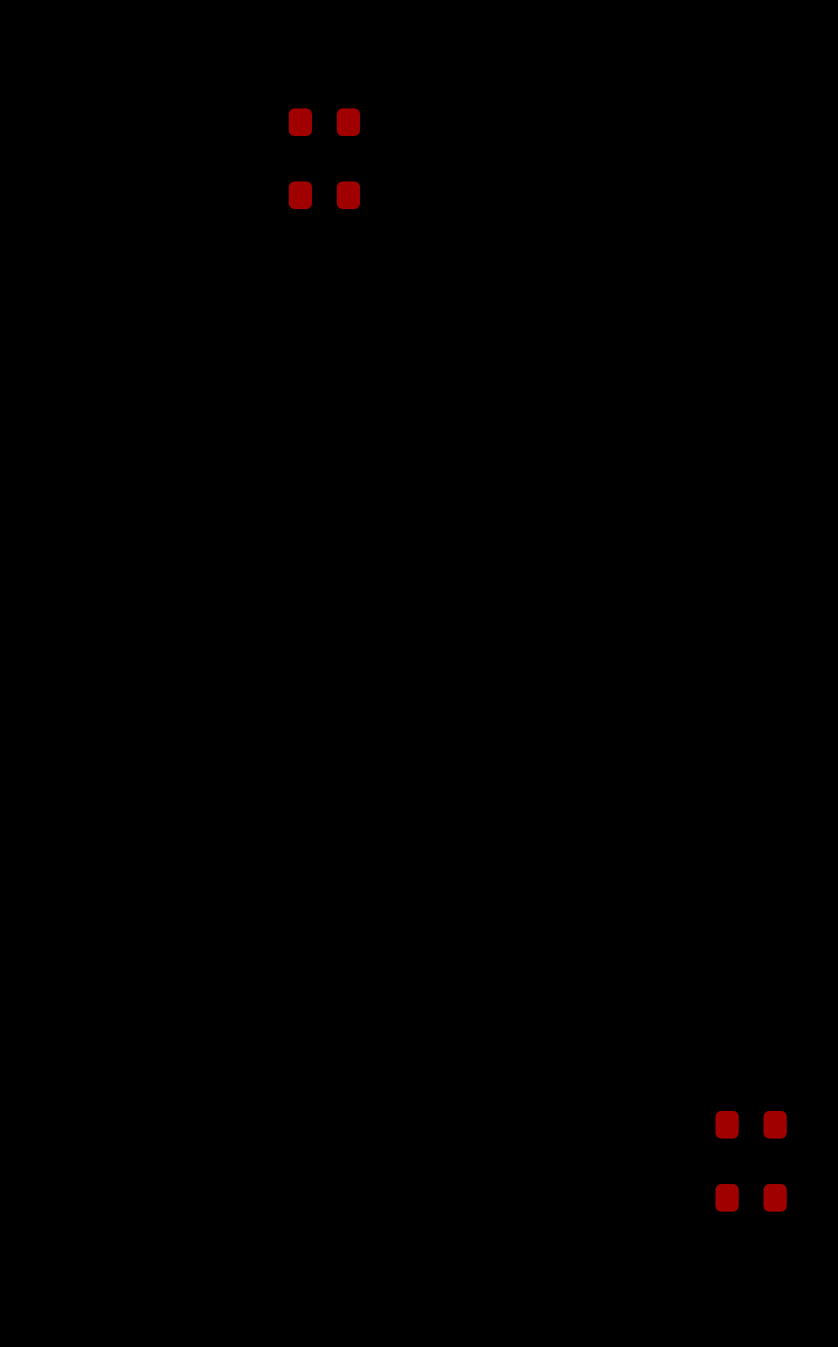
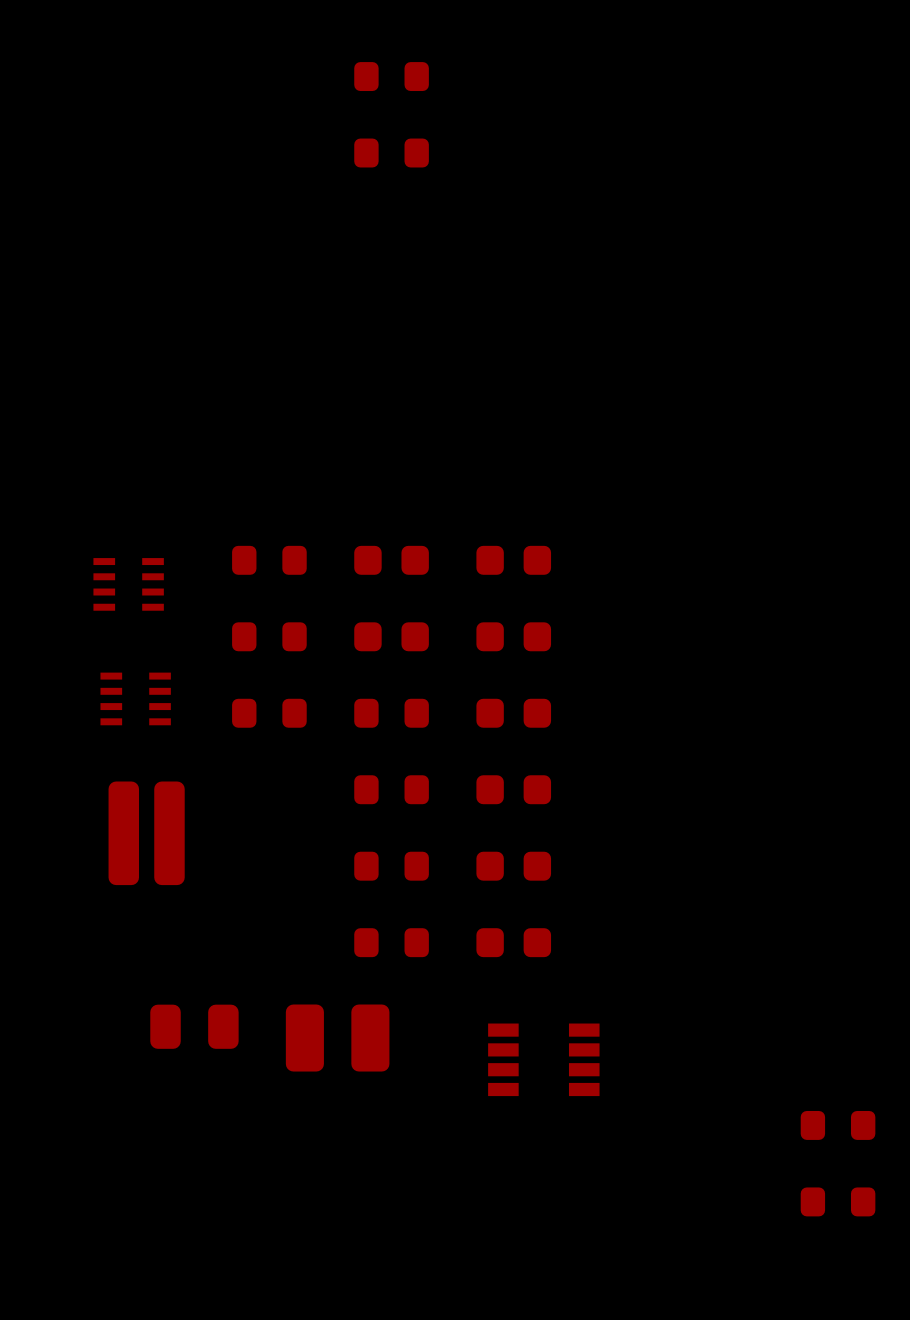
part: none -> (269, 560)
part: none -> (391, 560)
part: none -> (513, 560)
part: none -> (128, 584)
part: none -> (269, 636)
part: none -> (391, 636)
part: none -> (513, 636)
part: none -> (135, 698)
part: none -> (269, 713)
part: none -> (391, 713)
part: none -> (513, 713)
part: none -> (391, 789)
part: none -> (513, 789)
part: none -> (146, 833)
part: none -> (391, 866)
part: none -> (513, 866)
part: none -> (391, 942)
part: none -> (513, 942)
part: none -> (194, 1026)
part: none -> (337, 1038)
part: none -> (543, 1059)

